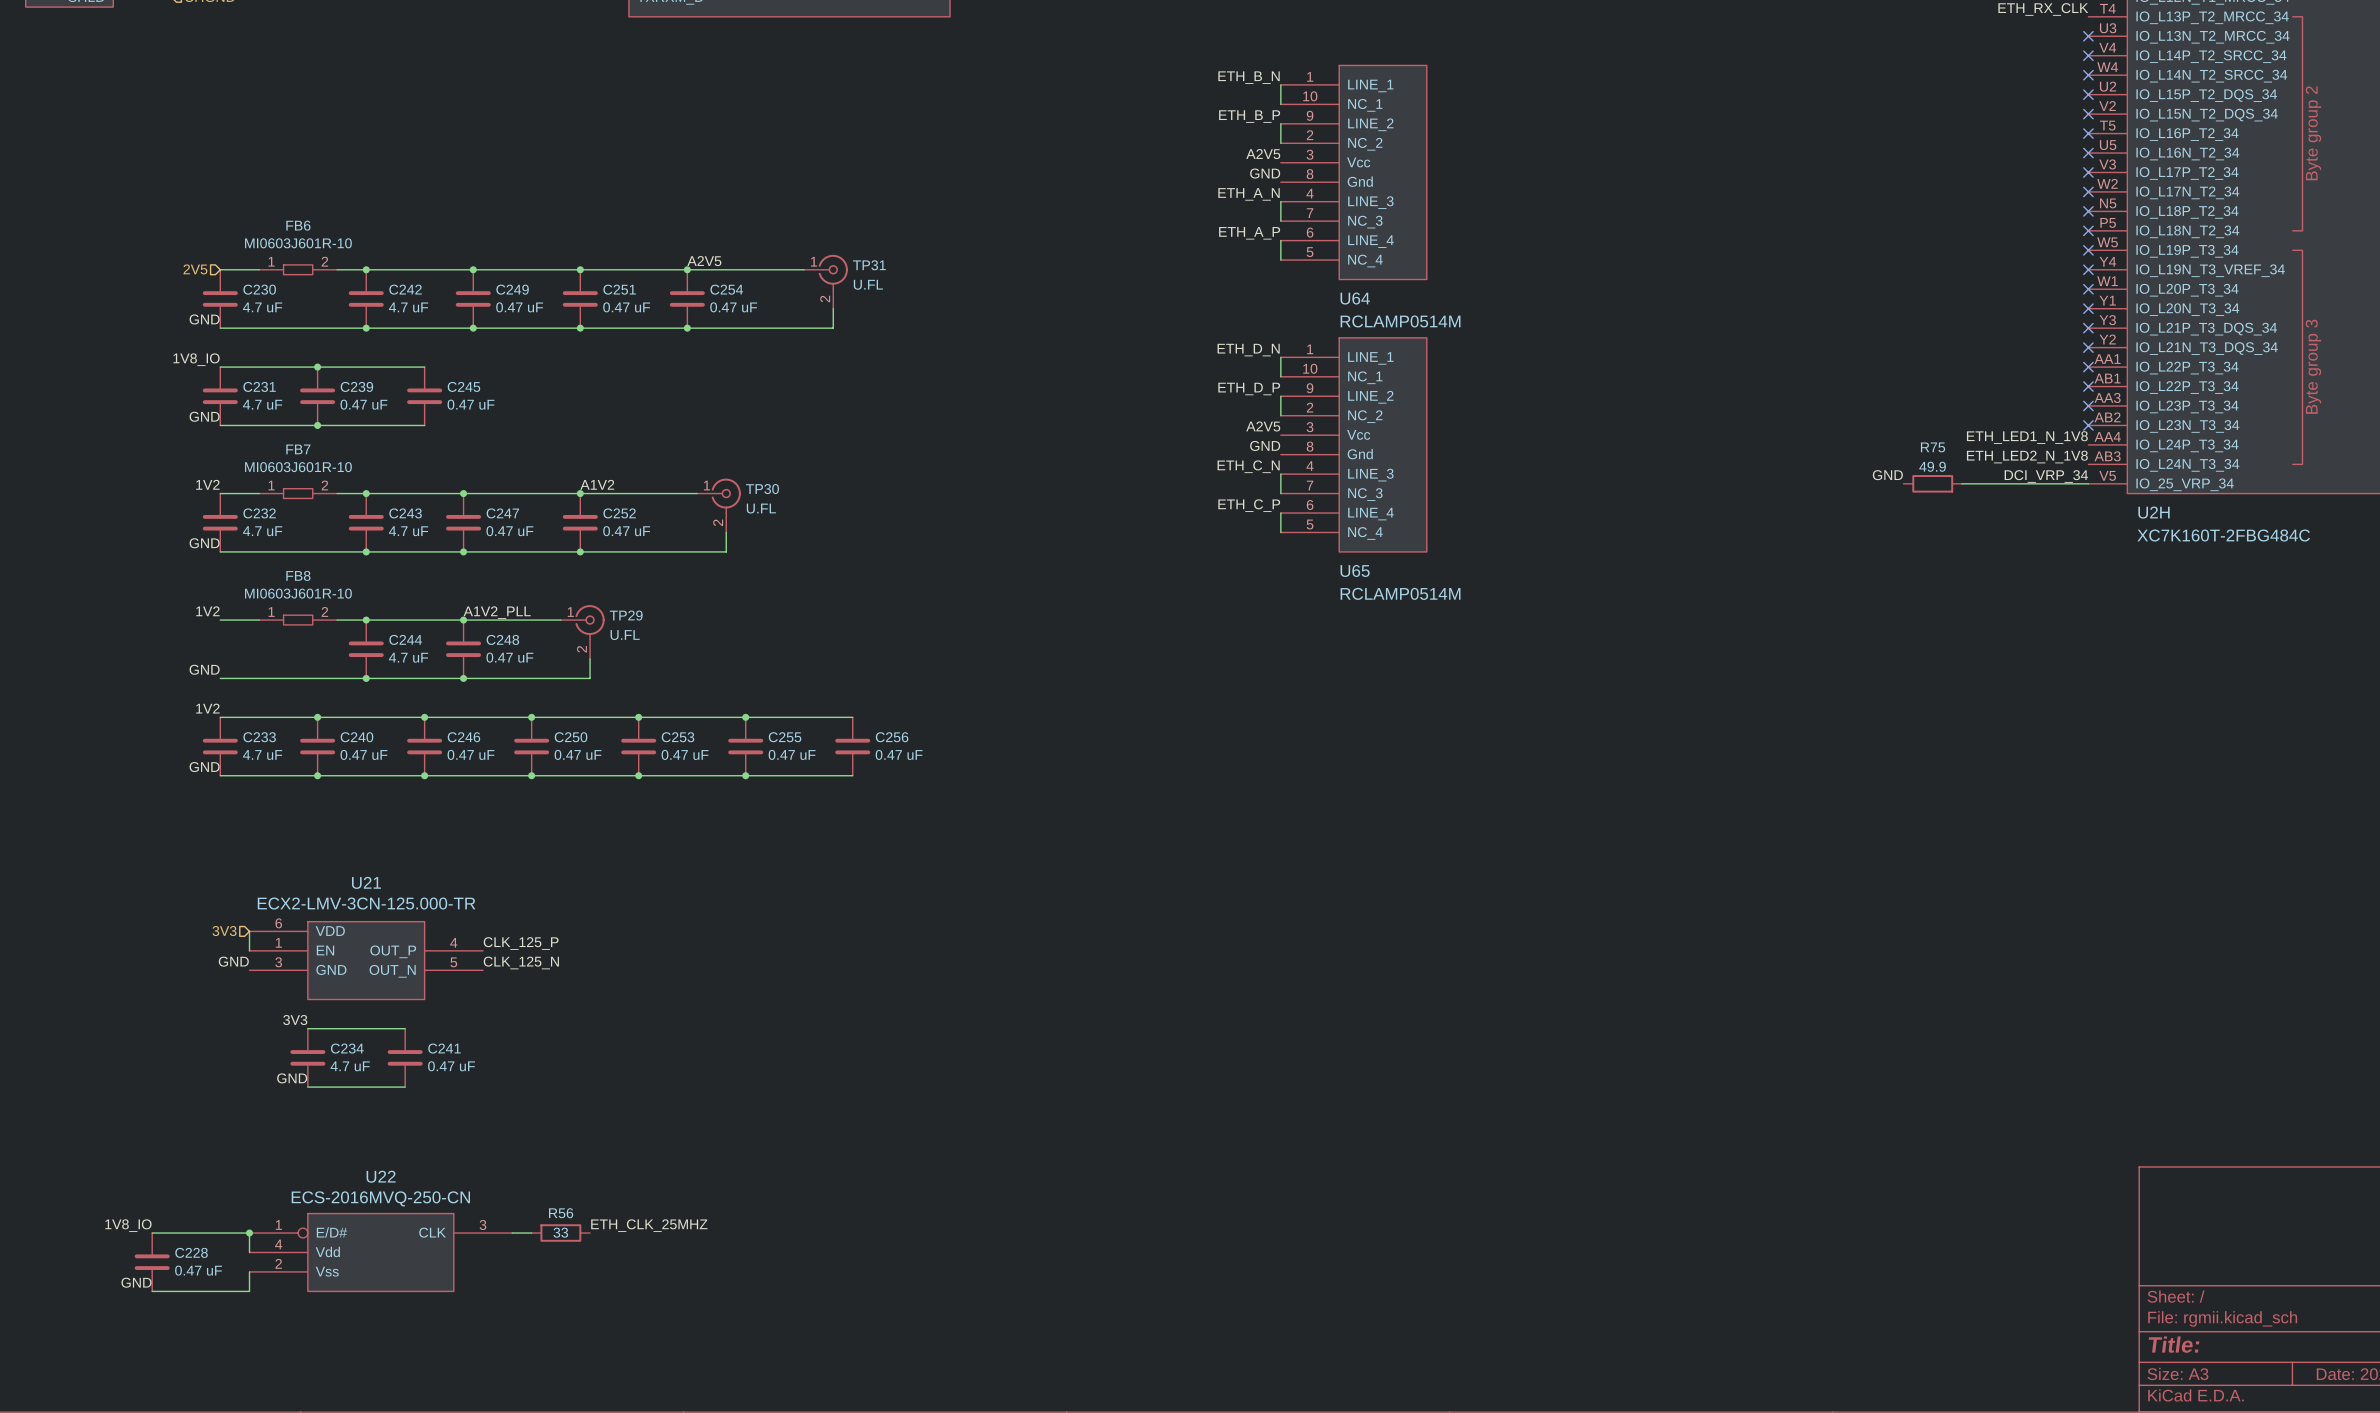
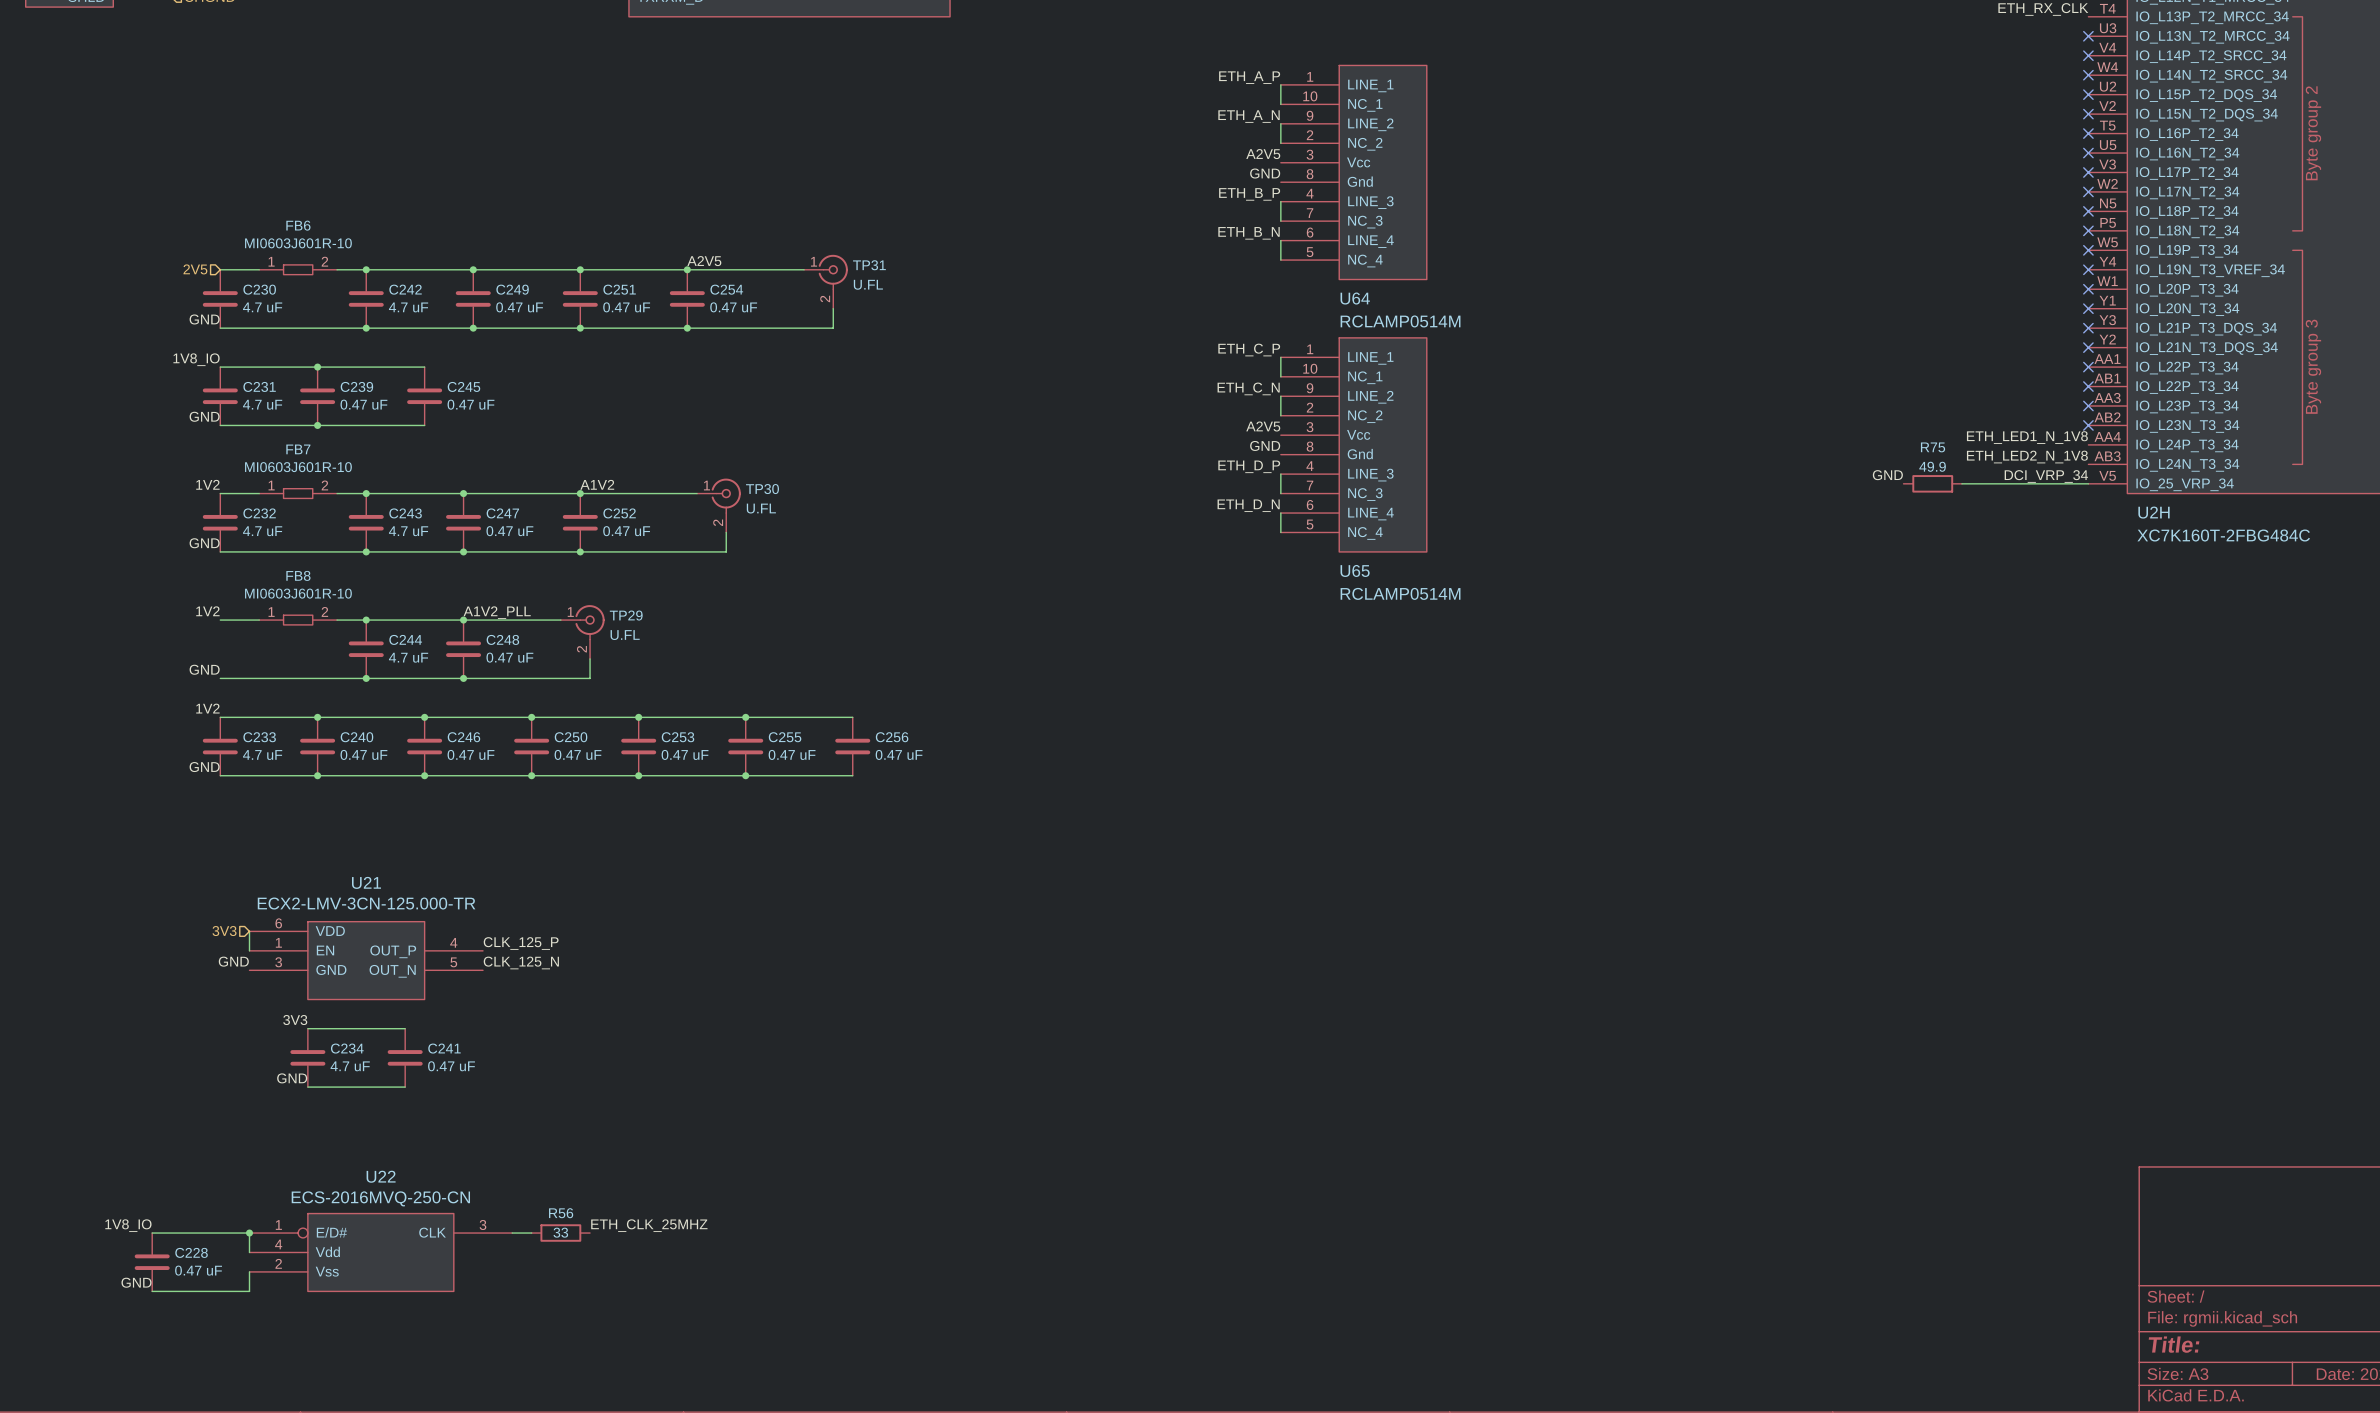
label: ETH_B_N (1249, 77) -> ETH_A_P (1249, 77)
label: ETH_B_P (1249, 116) -> ETH_A_N (1249, 116)
label: ETH_A_N (1249, 194) -> ETH_B_P (1249, 194)
label: ETH_A_P (1249, 233) -> ETH_B_N (1249, 233)
label: ETH_D_N (1248, 350) -> ETH_C_P (1249, 350)
label: ETH_D_P (1249, 388) -> ETH_C_N (1248, 388)
label: ETH_C_N (1248, 466) -> ETH_D_P (1249, 466)
label: ETH_C_P (1249, 505) -> ETH_D_N (1248, 505)

